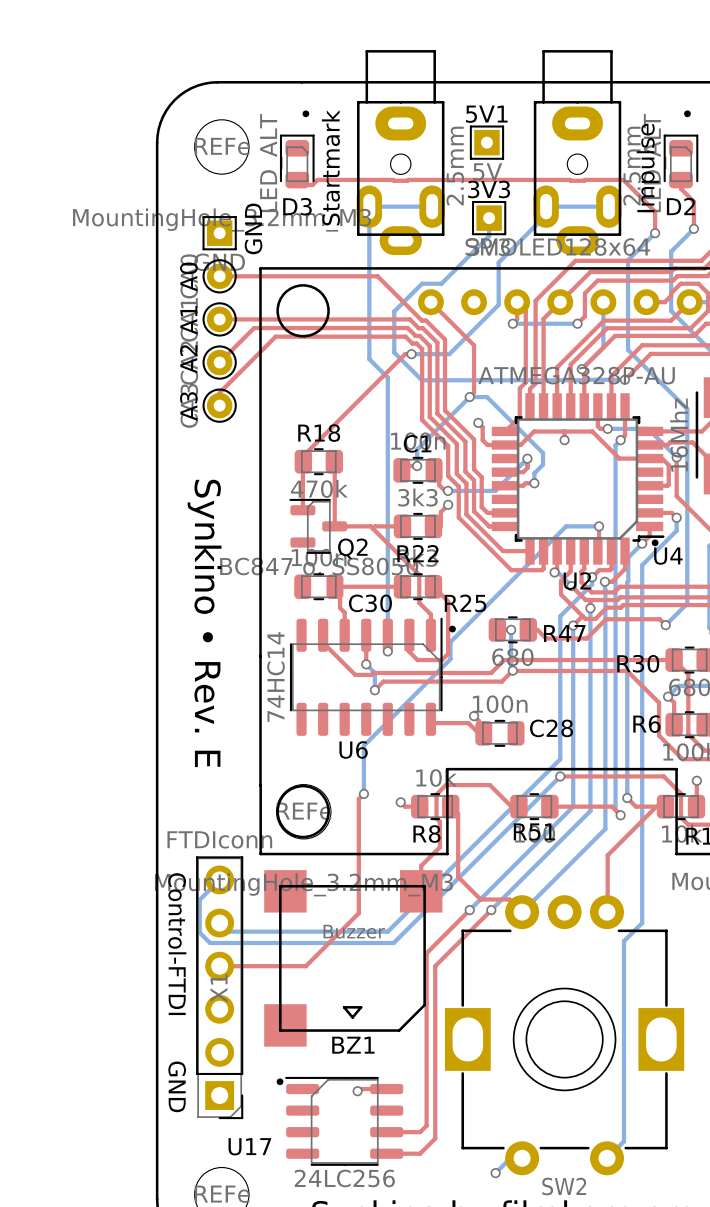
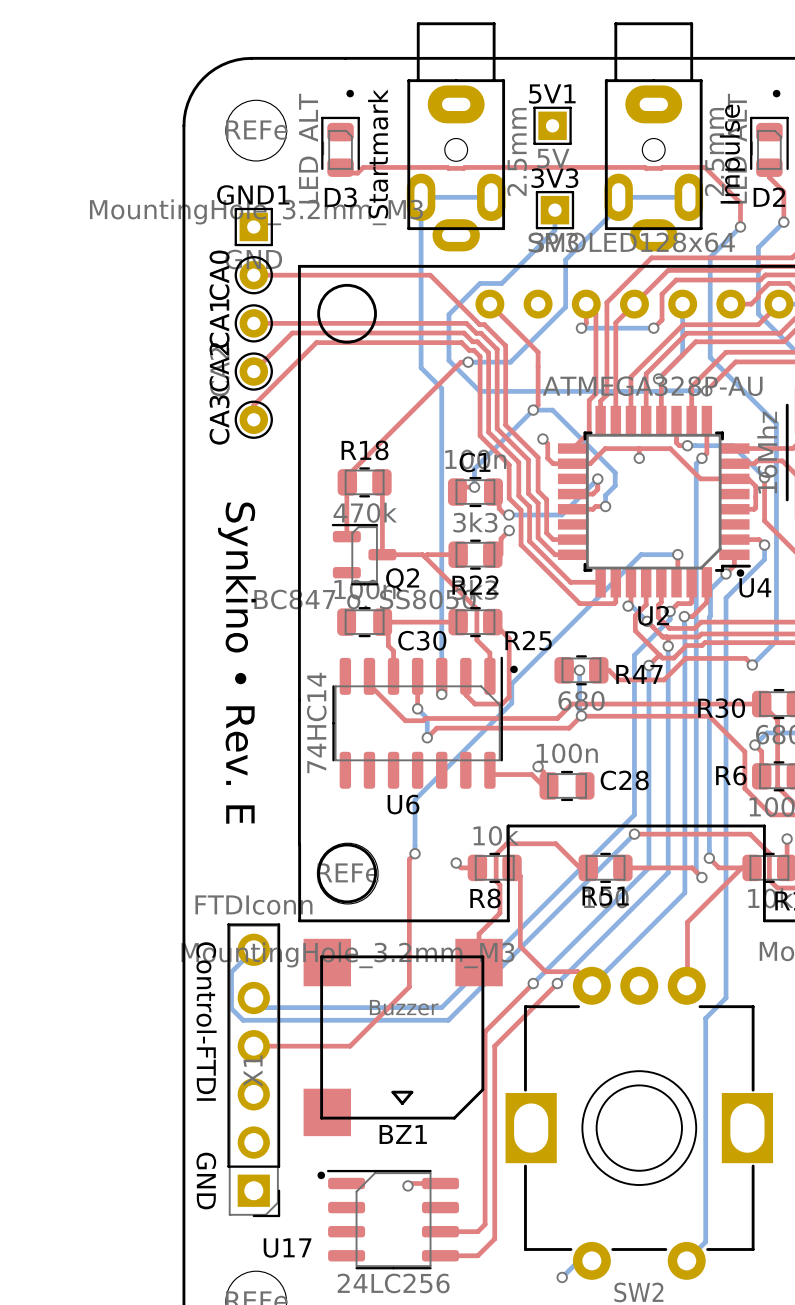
GND name: GND (253, 228) -> GND1 (253, 195)
A0 name: A0 (188, 276) -> CA0 (219, 275)
A1 name: A1 (188, 320) -> CA1 (219, 323)
A2 name: A2 (188, 359) -> CA2 (219, 367)
A3 name: A3 (188, 406) -> CA3 (219, 420)

